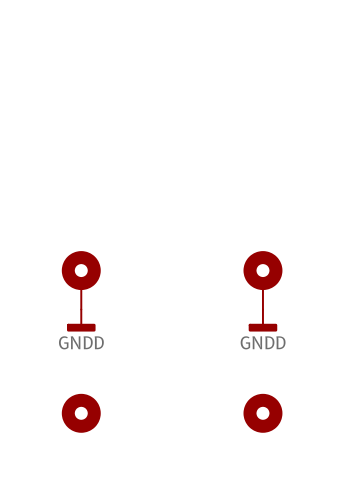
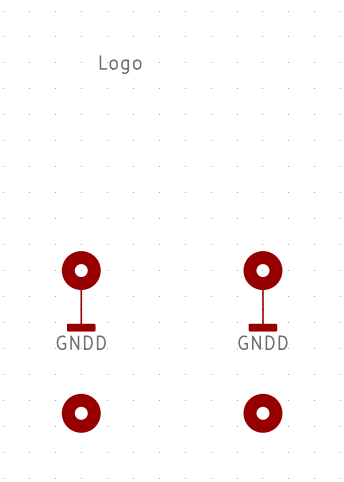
part: none -> Logo (120, 64)

